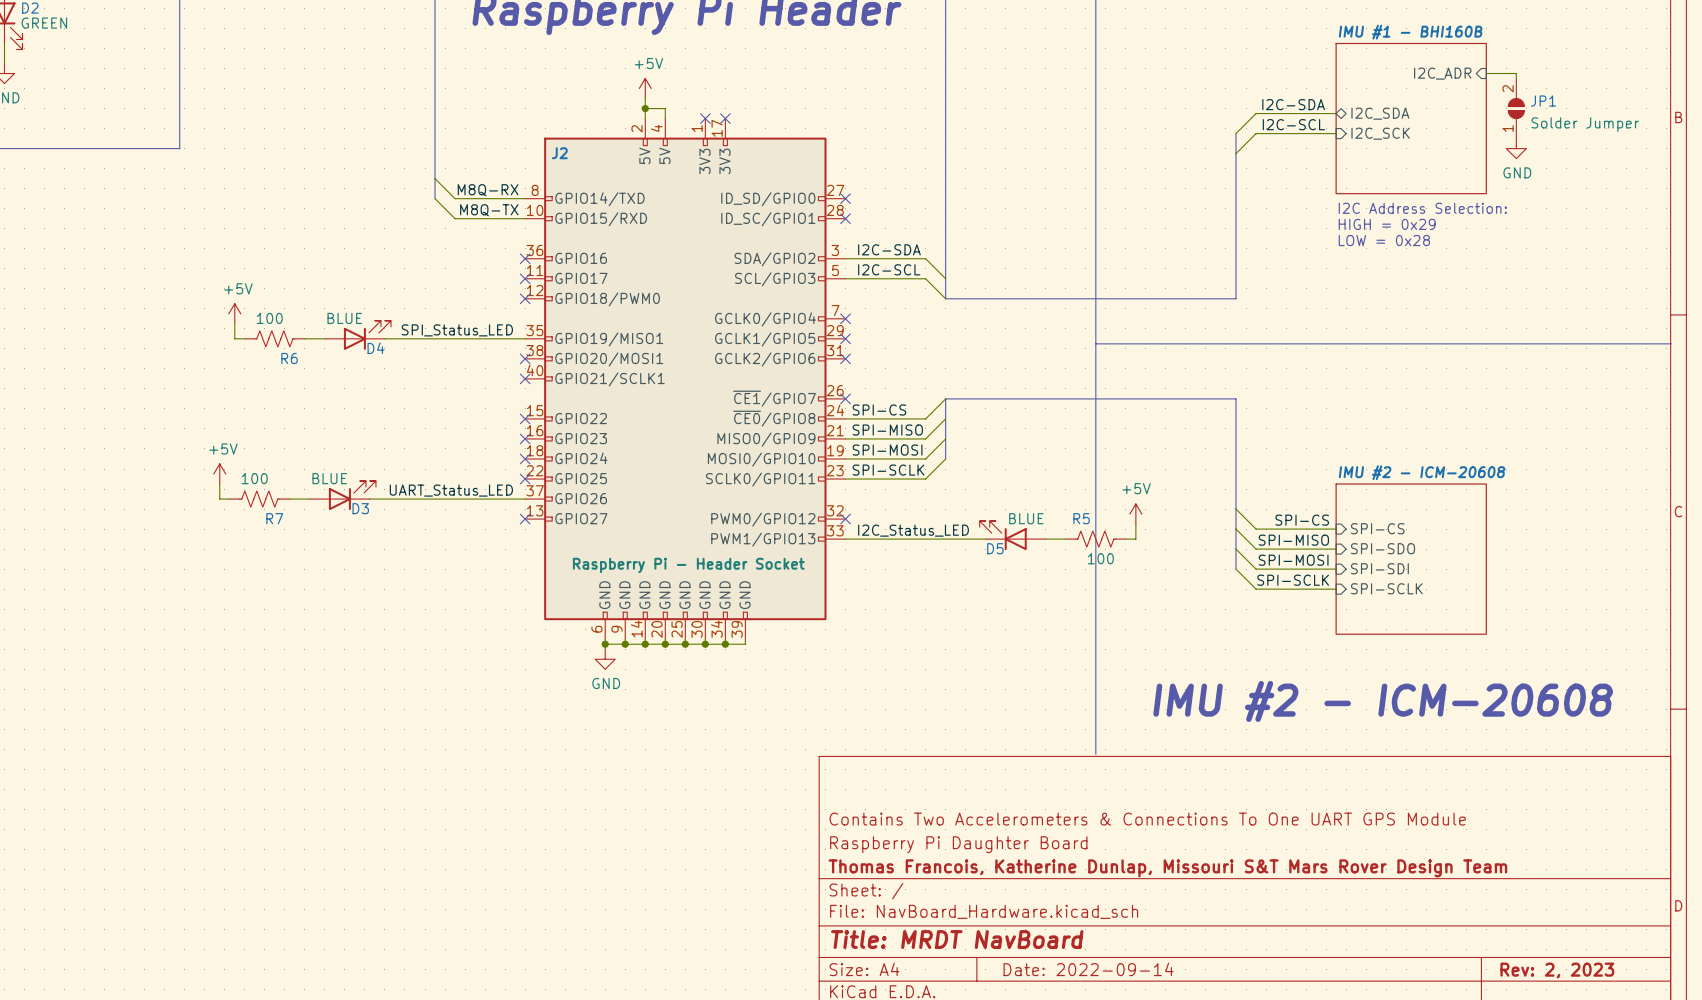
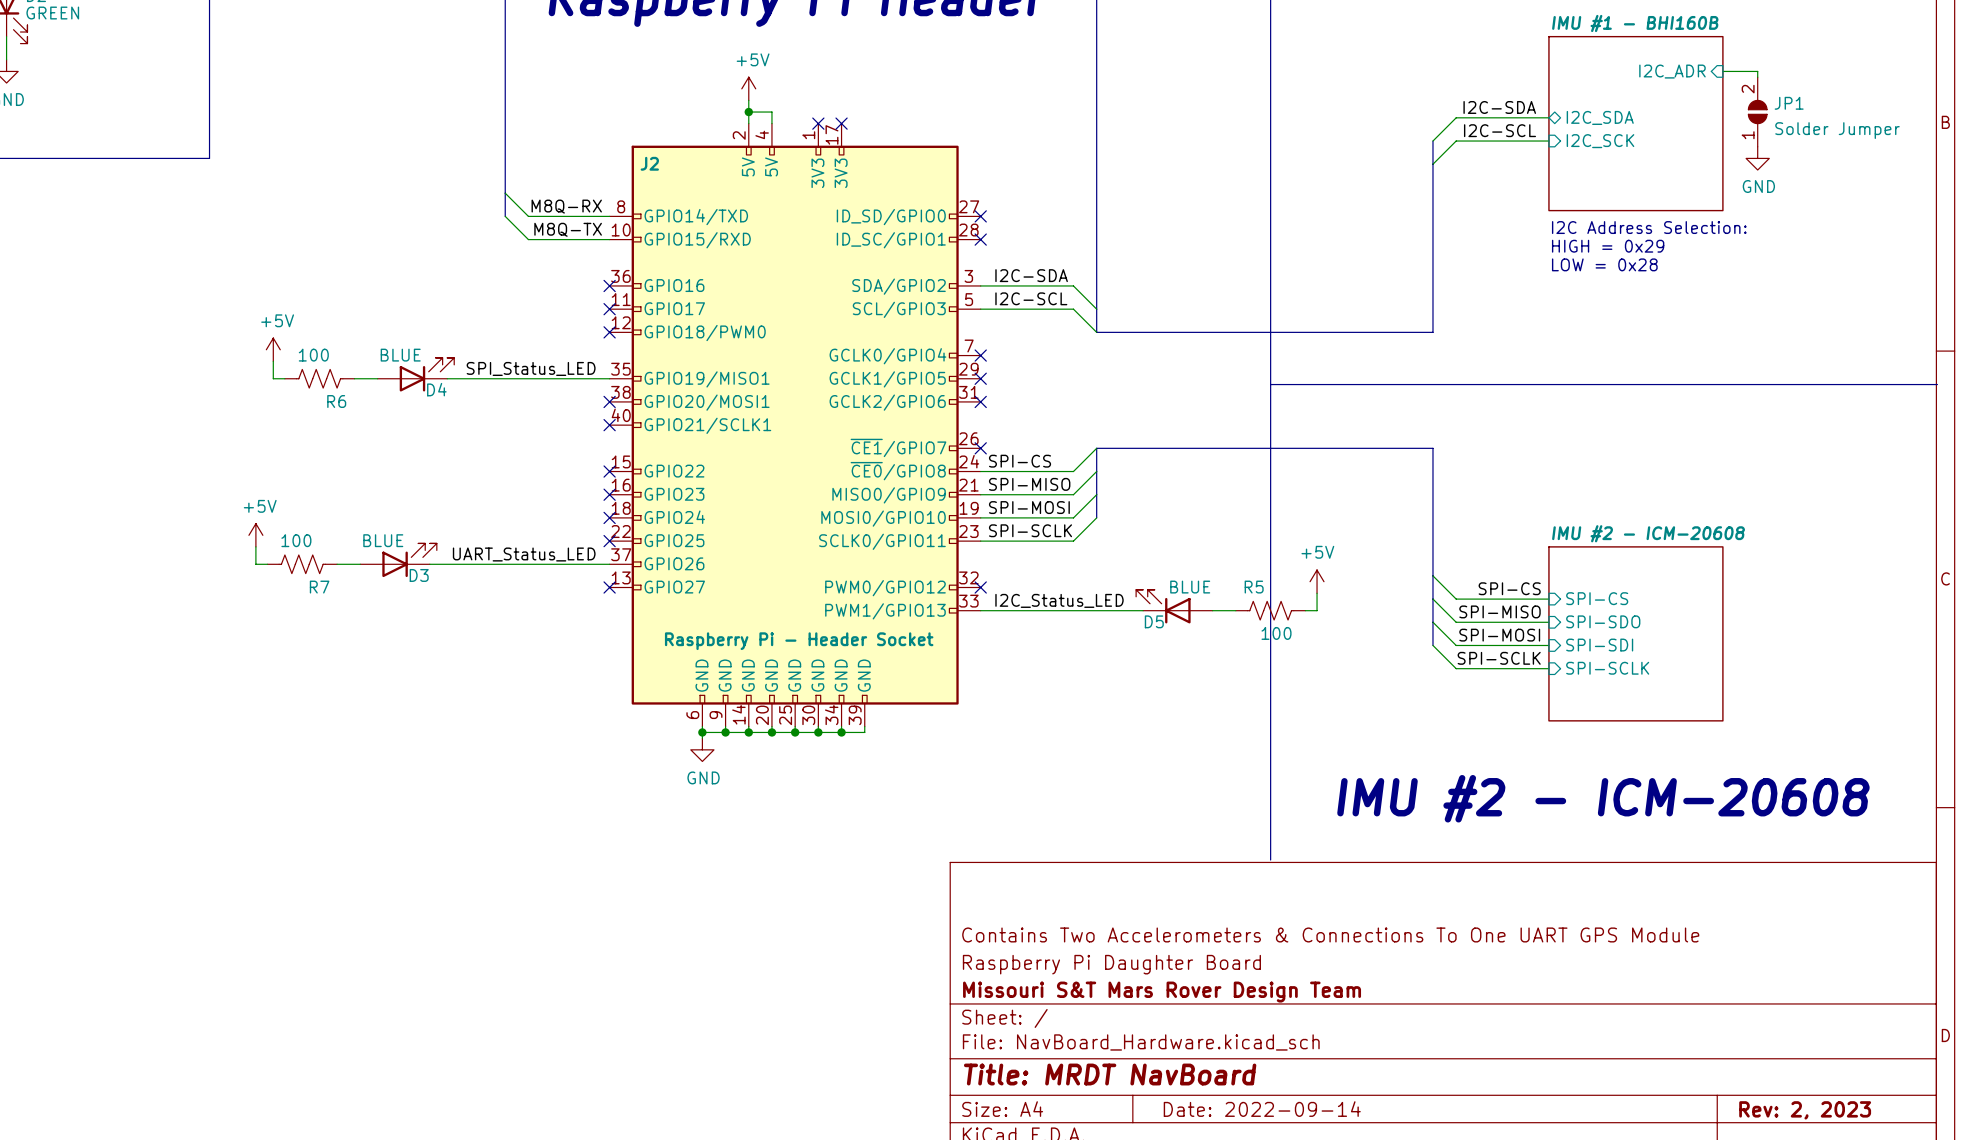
title block: Thomas Francois, Katherine Dunlap, Missouri S&T Mars Rover Design Team (1167, 868) -> Missouri S&T Mars Rover Design Team (1162, 992)

